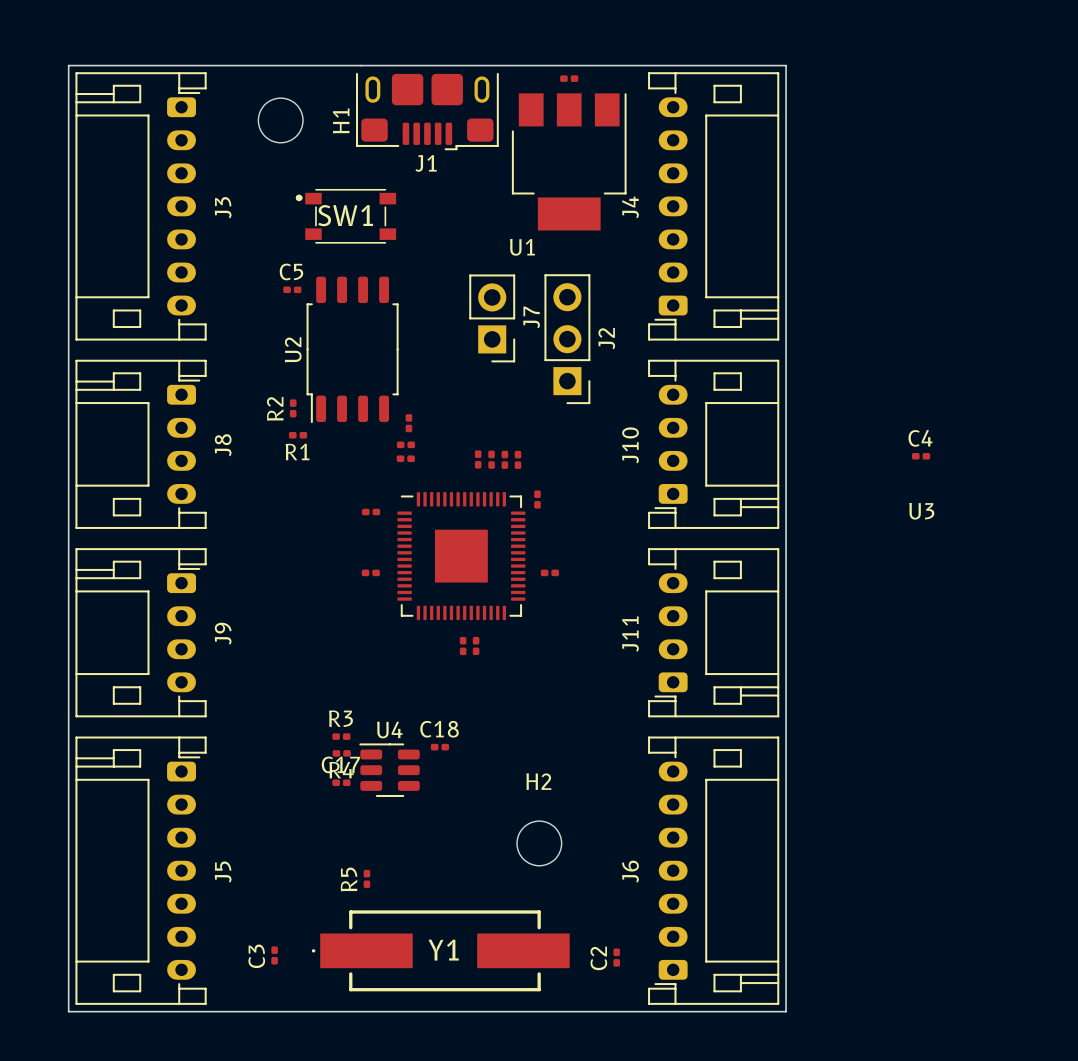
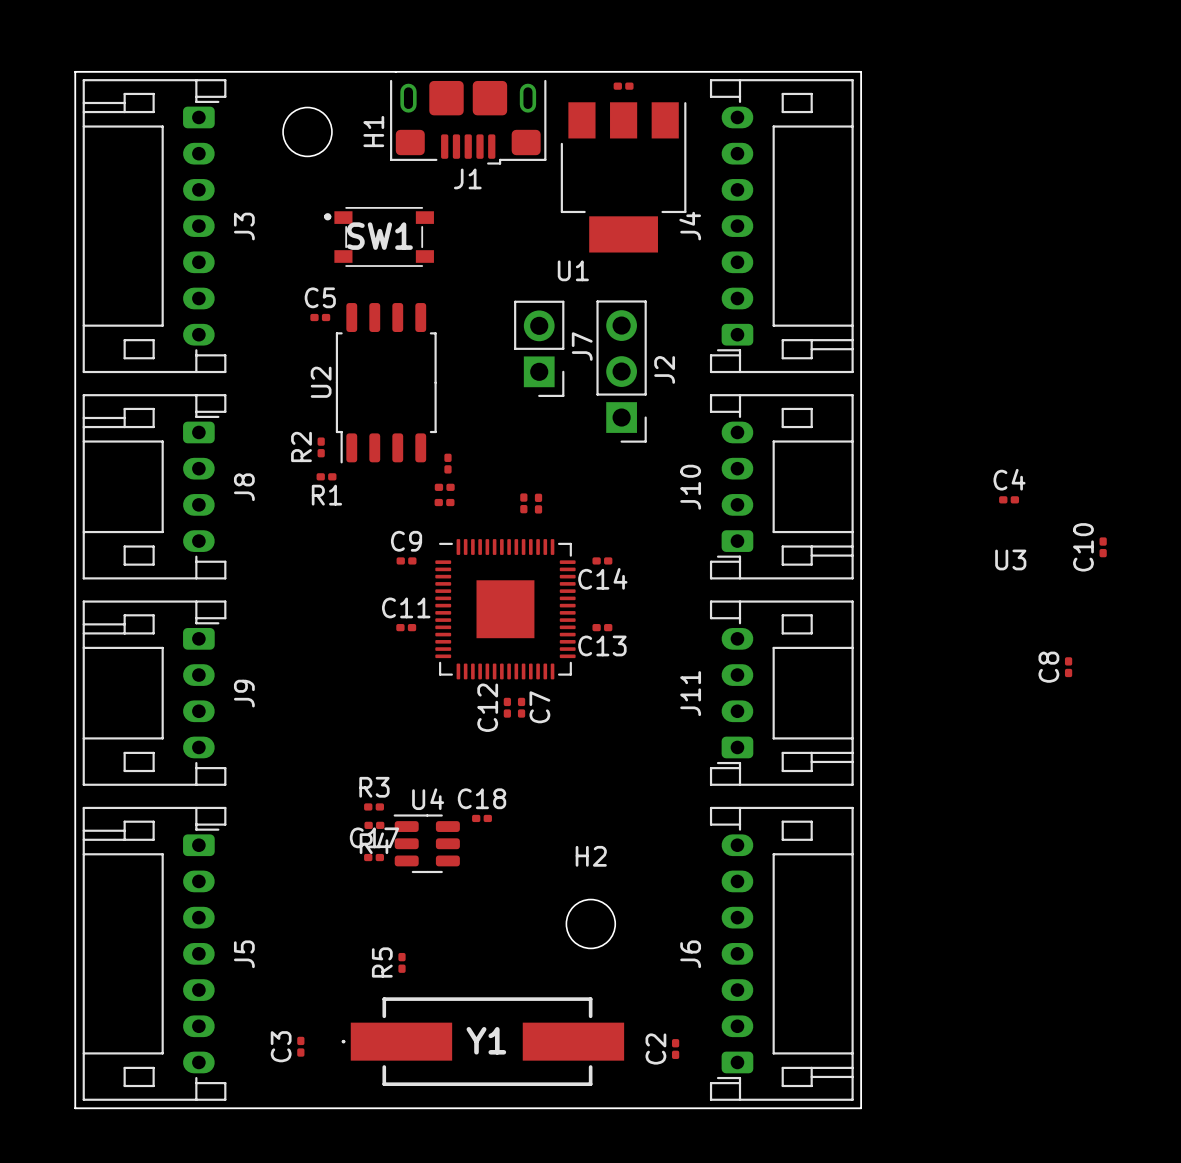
part: (504, 459) -> none
part: (517, 459) -> none
C9 name: none -> C9 (406, 541)
part: (537, 499) -> none
C10: none -> (1103, 547)
C14: none -> (602, 560)
C11 name: none -> C11 (406, 607)
C13 name: none -> C13 (602, 645)
C8: none -> (1068, 667)
C12 name: none -> C12 (487, 707)
C7 name: none -> C7 (539, 707)

